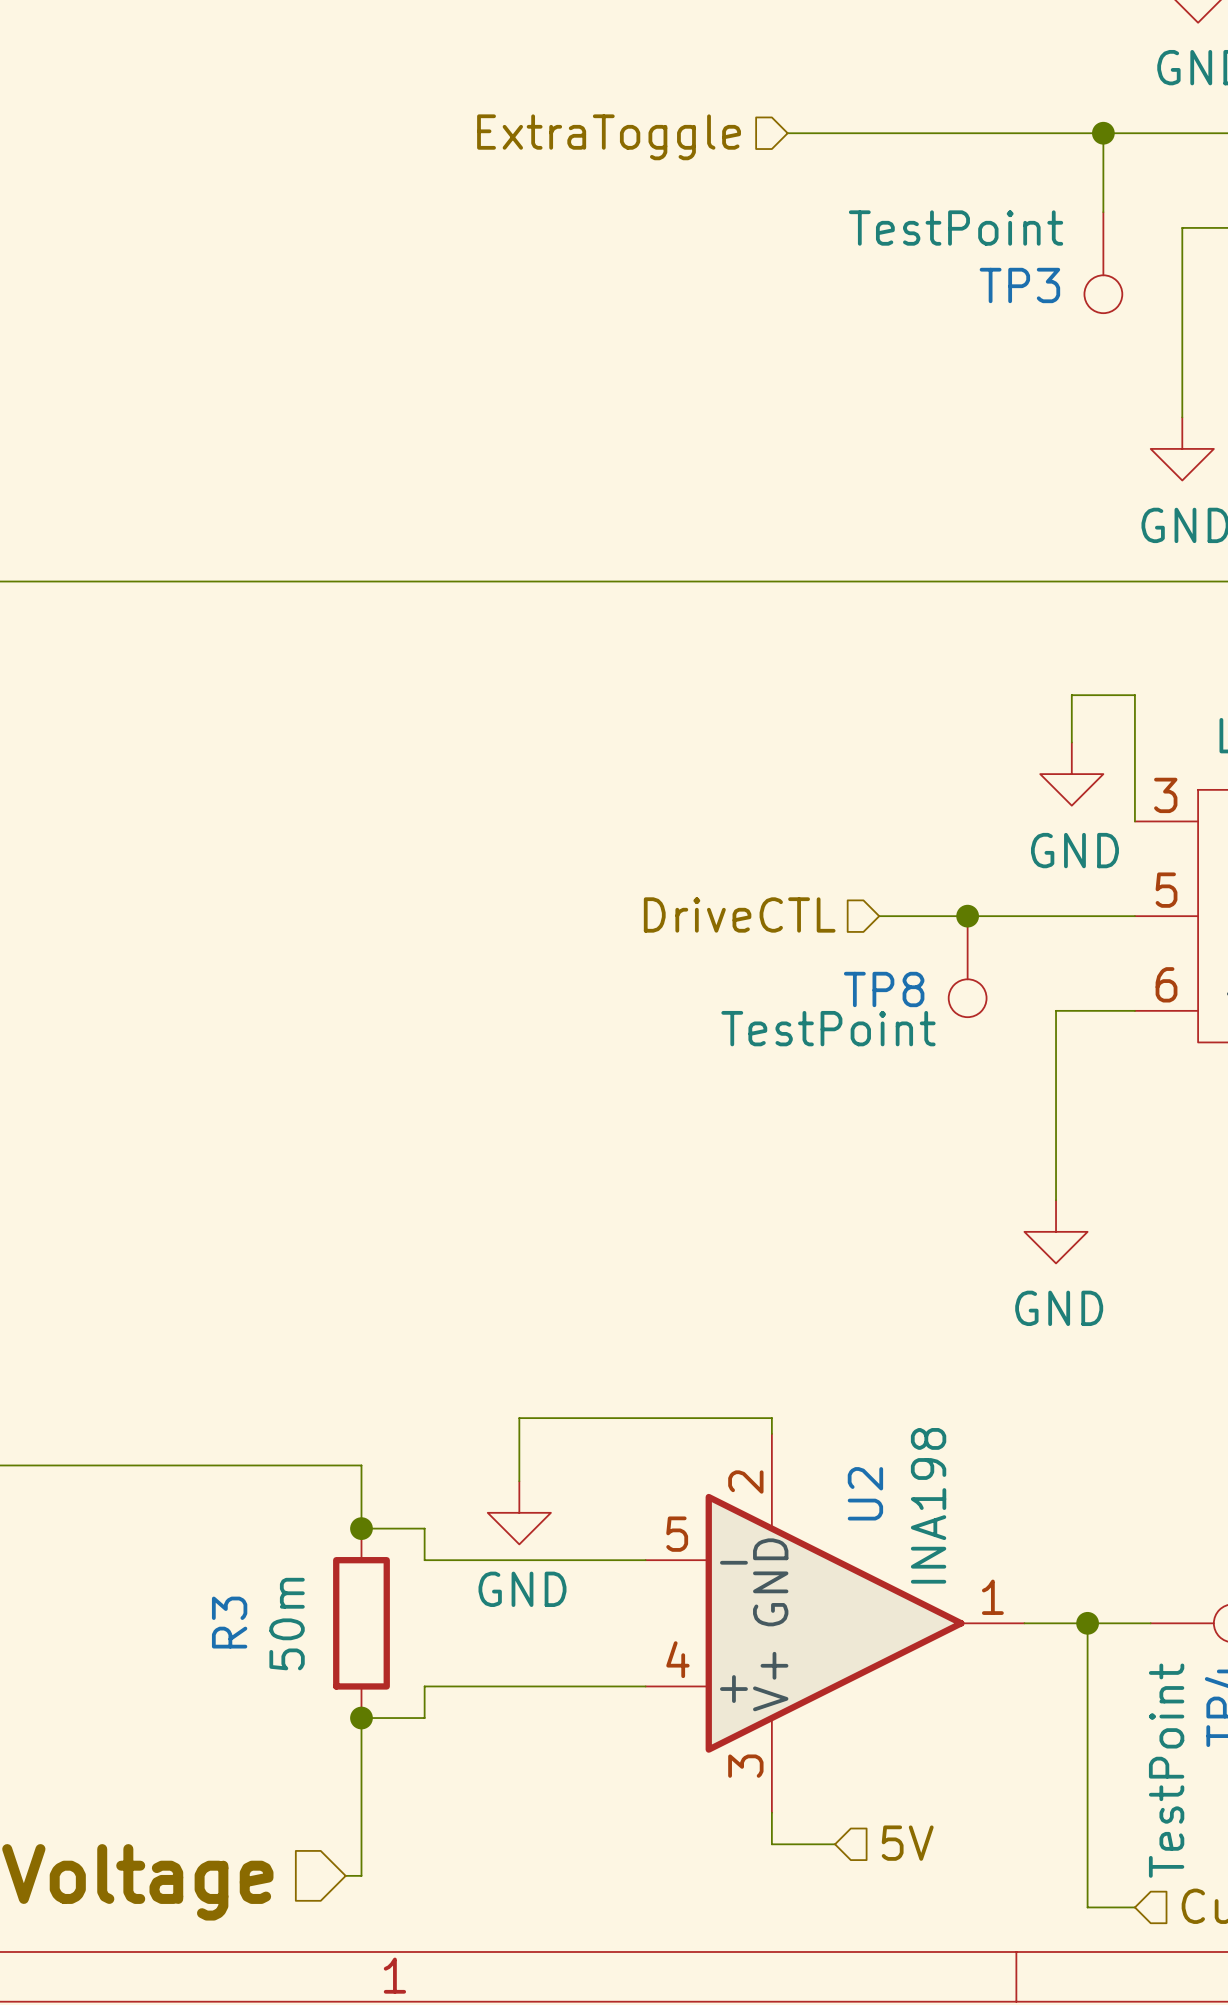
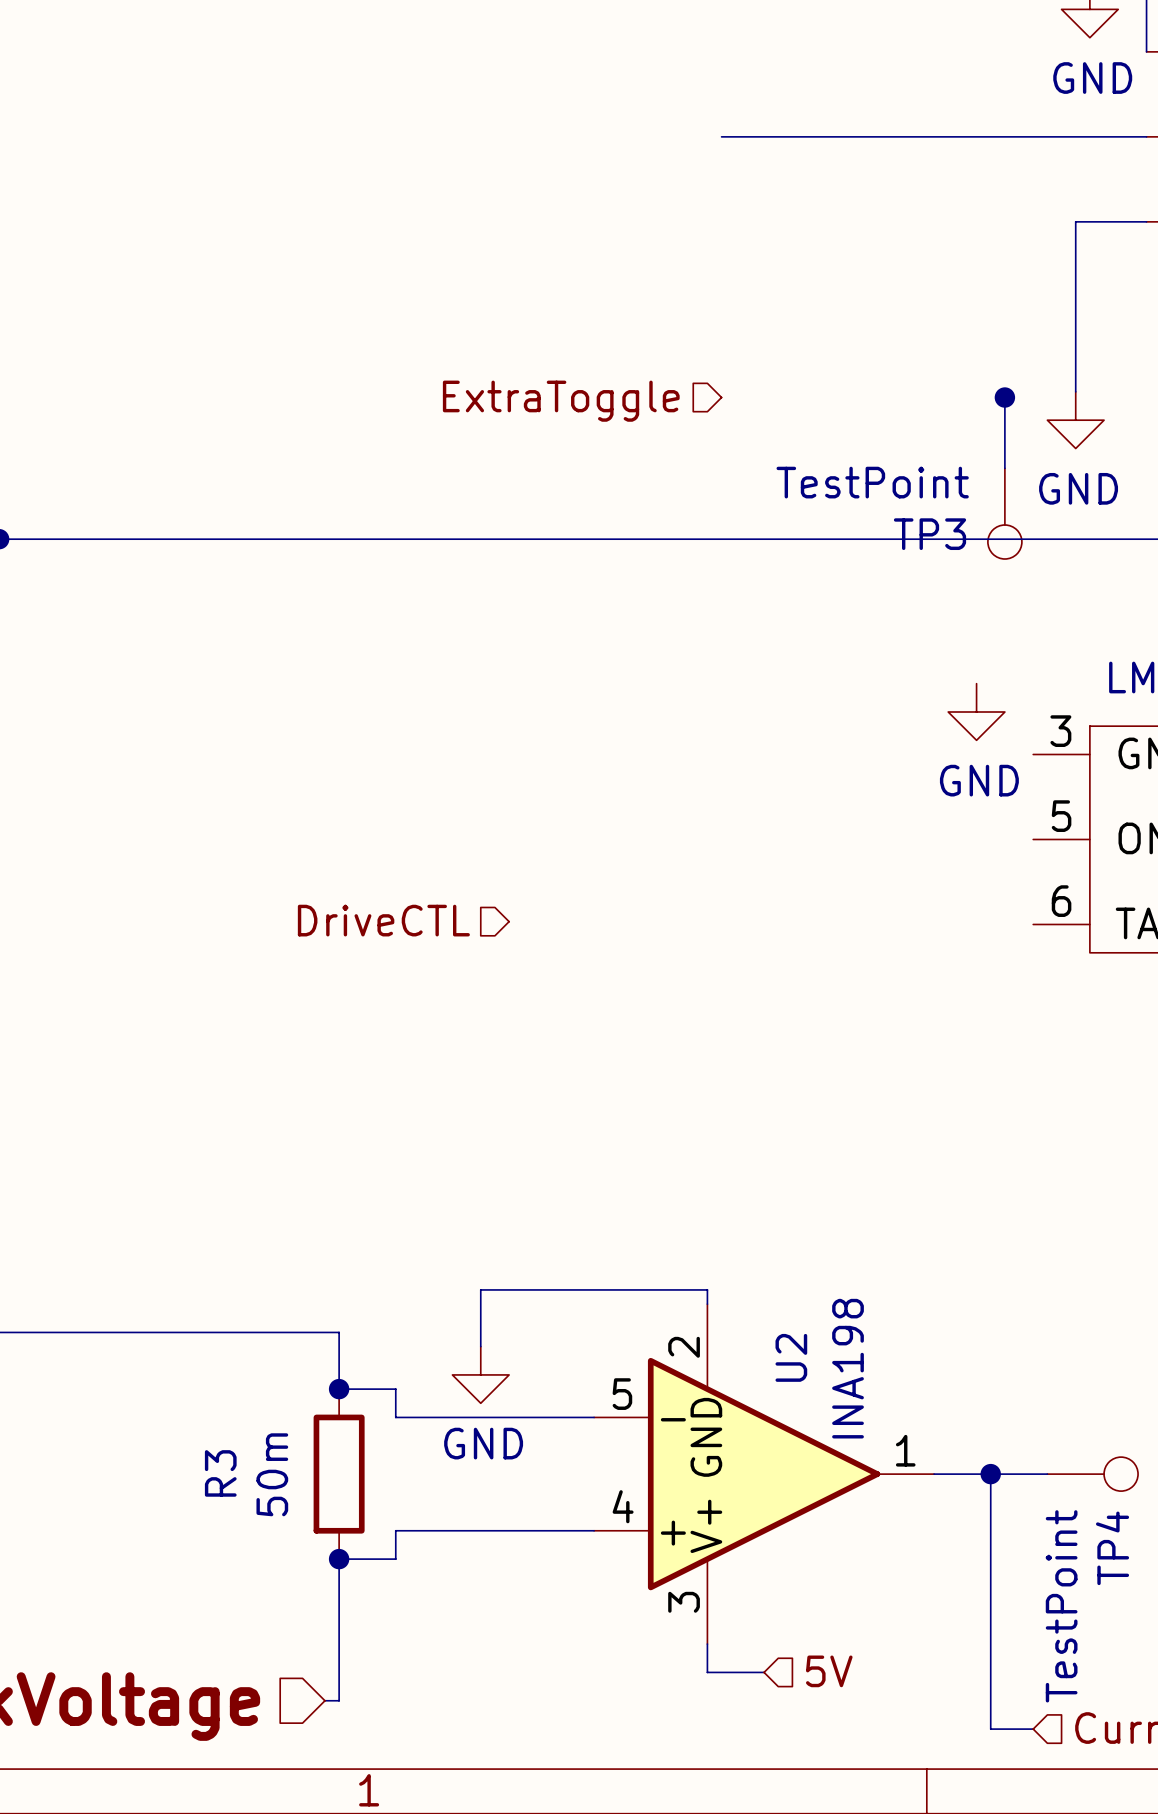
wire: (1103, 133) (1103, 212) -> (1004, 397) (1004, 468)
junction: (1103, 133) -> none
hierarchical label position: ExtraToggle (609, 137) -> ExtraToggle (561, 401)
TP3 position: (1103, 262) -> (1004, 513)
junction: none -> (1004, 397)
wire: (1071, 742) (1071, 695) (1134, 695) (1134, 821) -> none
hierarchical label position: DriveCTL (739, 914) -> DriveCTL (383, 920)
wire: (879, 916) (1134, 916) -> none
junction: (967, 916) -> none
TP8: TestPoint (967, 966) -> none
wire: (1134, 1010) (1056, 1010) (1056, 1200) -> none
power symbol: GND (1056, 1231) -> none

